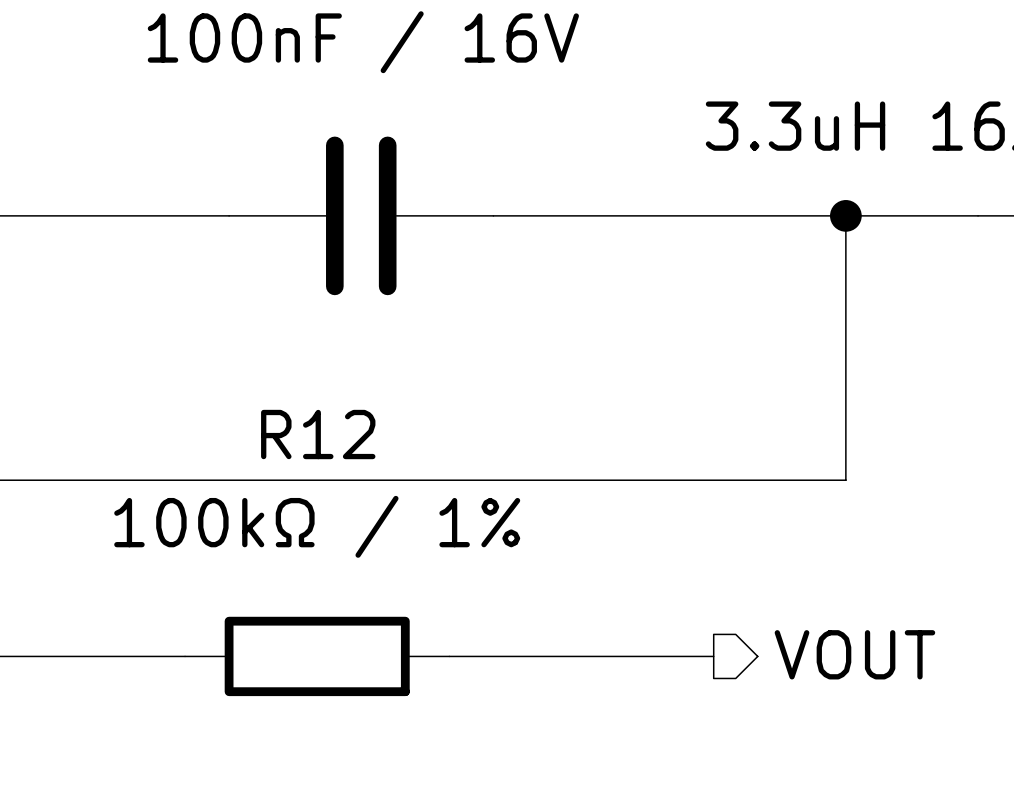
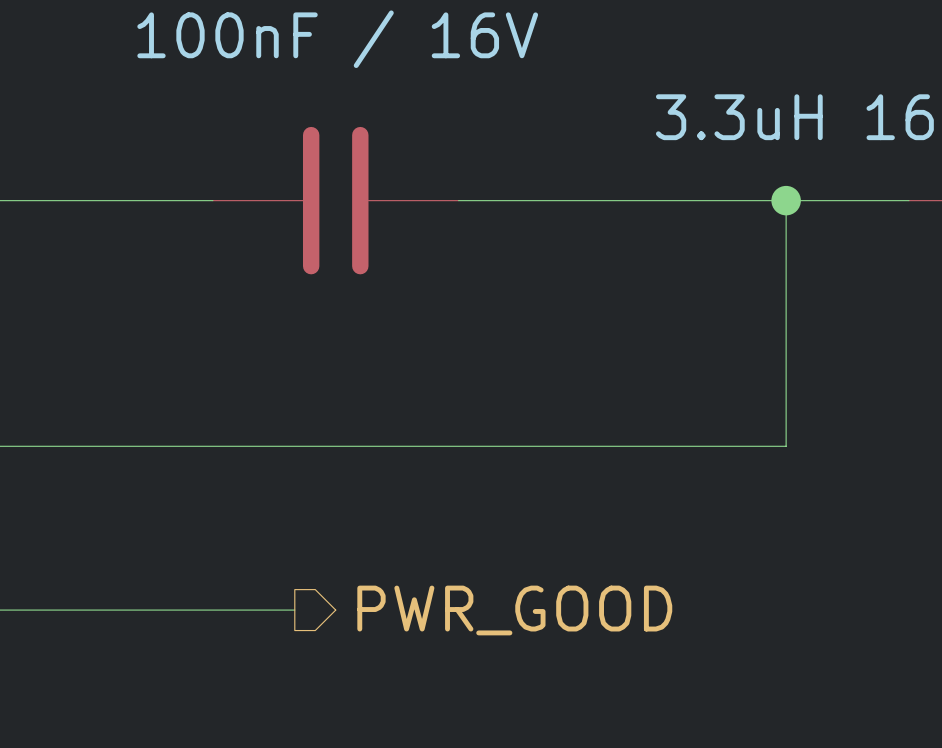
hierarchical label: VOUT (854, 654) -> none
wire: none -> (171, 610) (294, 610)
R12: 100kΩ / 1% (317, 656) -> none
wire: (449, 656) (713, 656) -> none
hierarchical label: none -> PWR_GOOD (514, 610)

